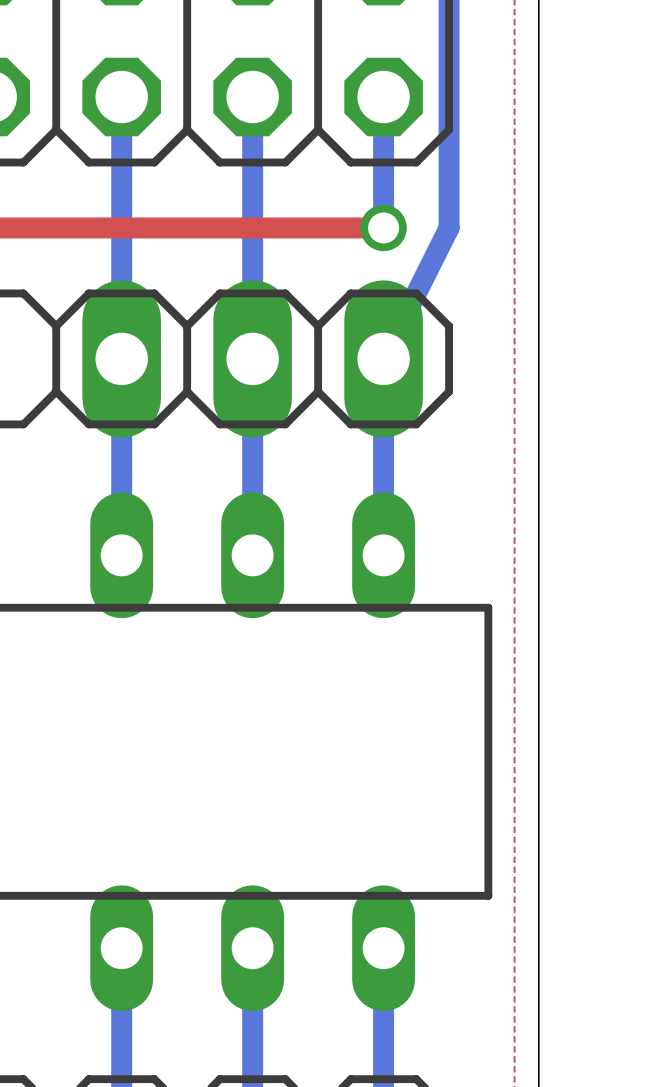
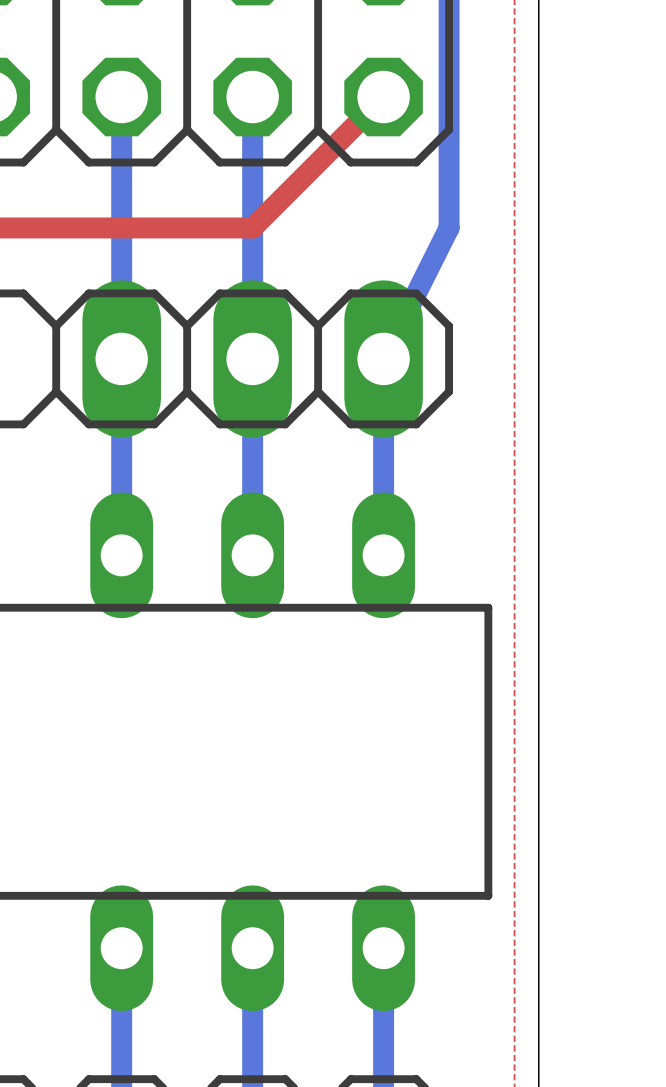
bottom track: (383, 97) (383, 227) -> none
top track: (252, 227) (383, 227) -> (252, 227) (383, 97)
via: (383, 227) -> none

